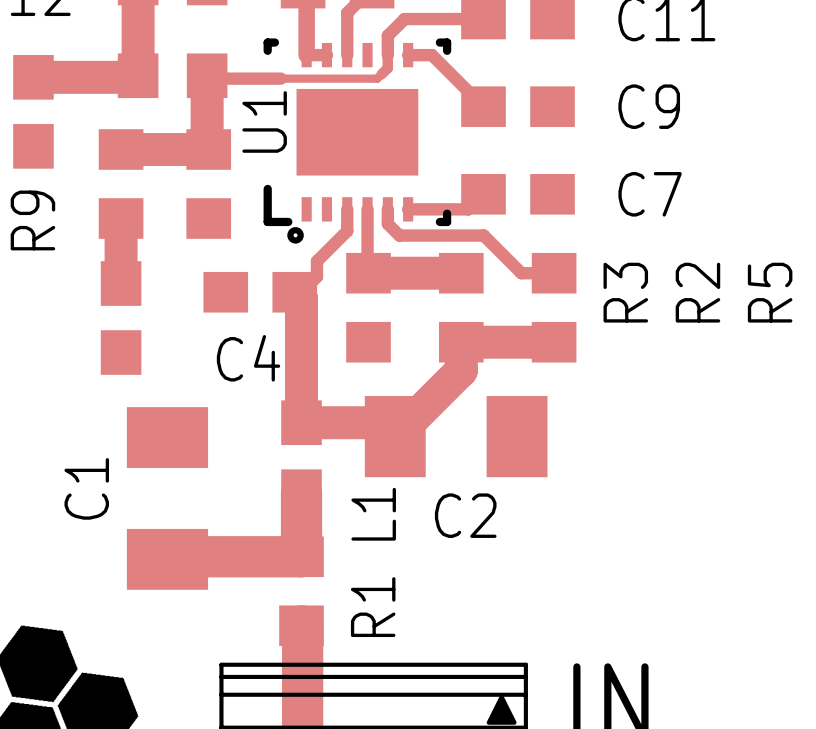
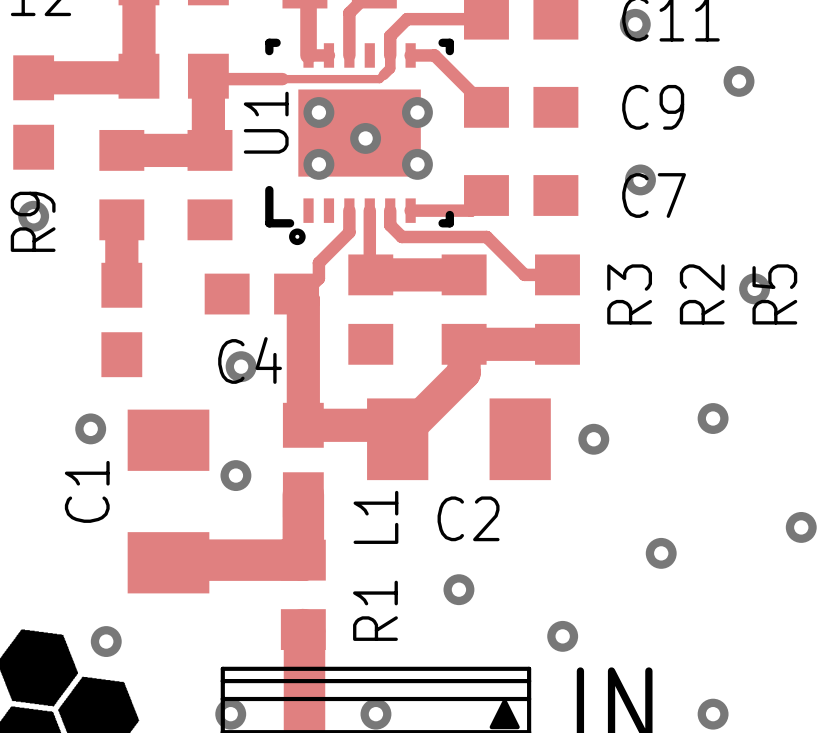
via: none -> (635, 24)
via: none -> (739, 81)
via: none -> (318, 112)
via: none -> (417, 112)
via: none -> (365, 138)
via: none -> (318, 164)
via: none -> (417, 164)
via: none -> (640, 179)
via: none -> (33, 216)
via: none -> (754, 288)
via: none -> (241, 366)
via: none -> (713, 418)
via: none -> (90, 428)
via: none -> (593, 439)
via: none -> (235, 475)
via: none -> (801, 527)
via: none -> (661, 553)
via: none -> (458, 589)
via: none -> (562, 636)
via: none -> (106, 641)
via: none -> (230, 714)
via: none -> (375, 714)
via: none -> (713, 714)

